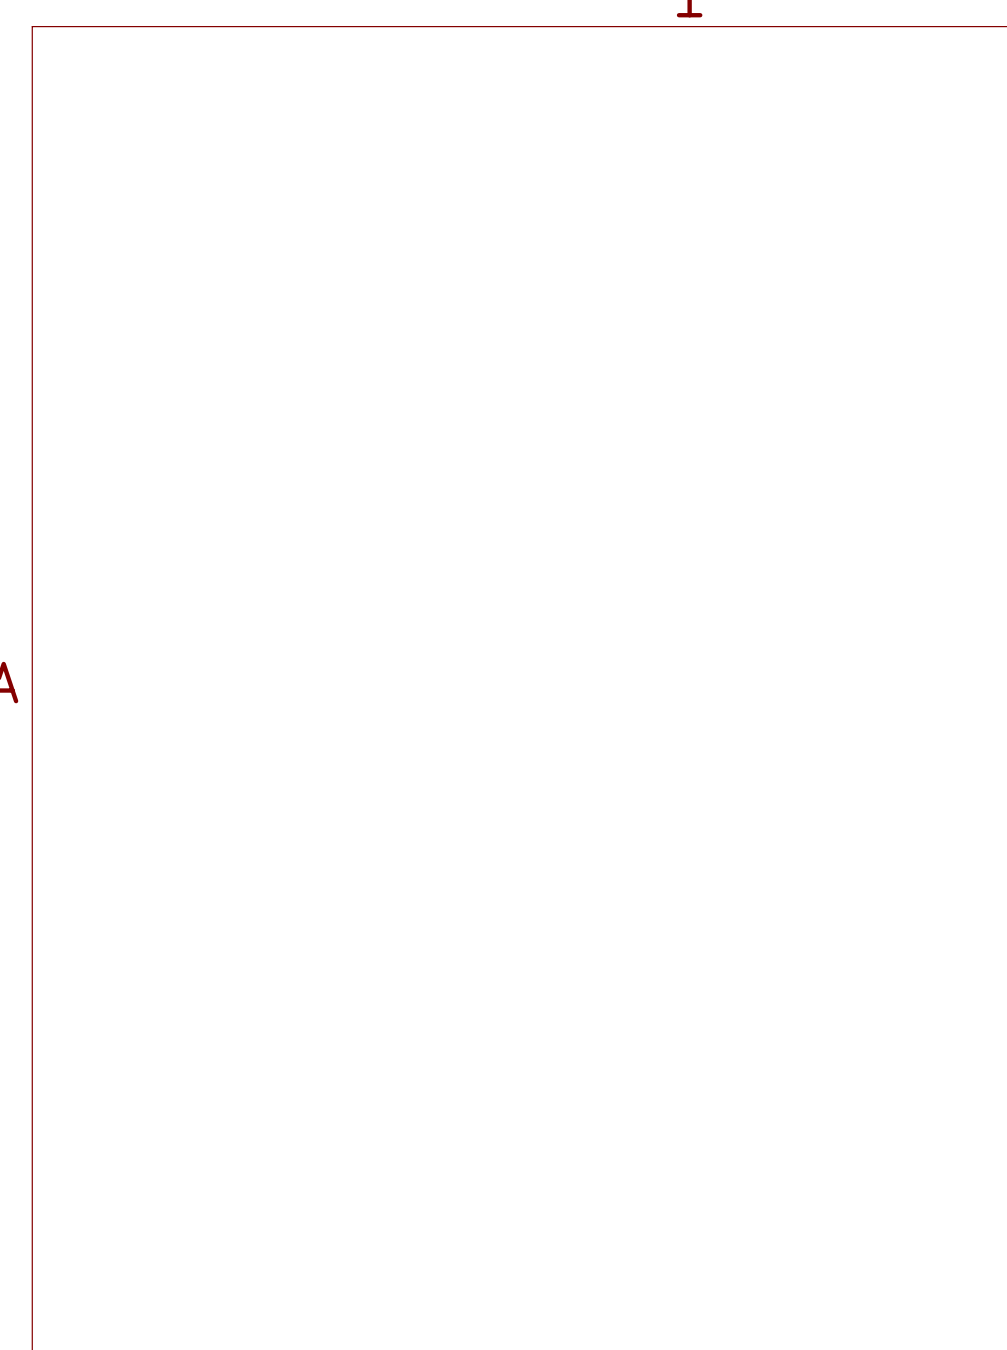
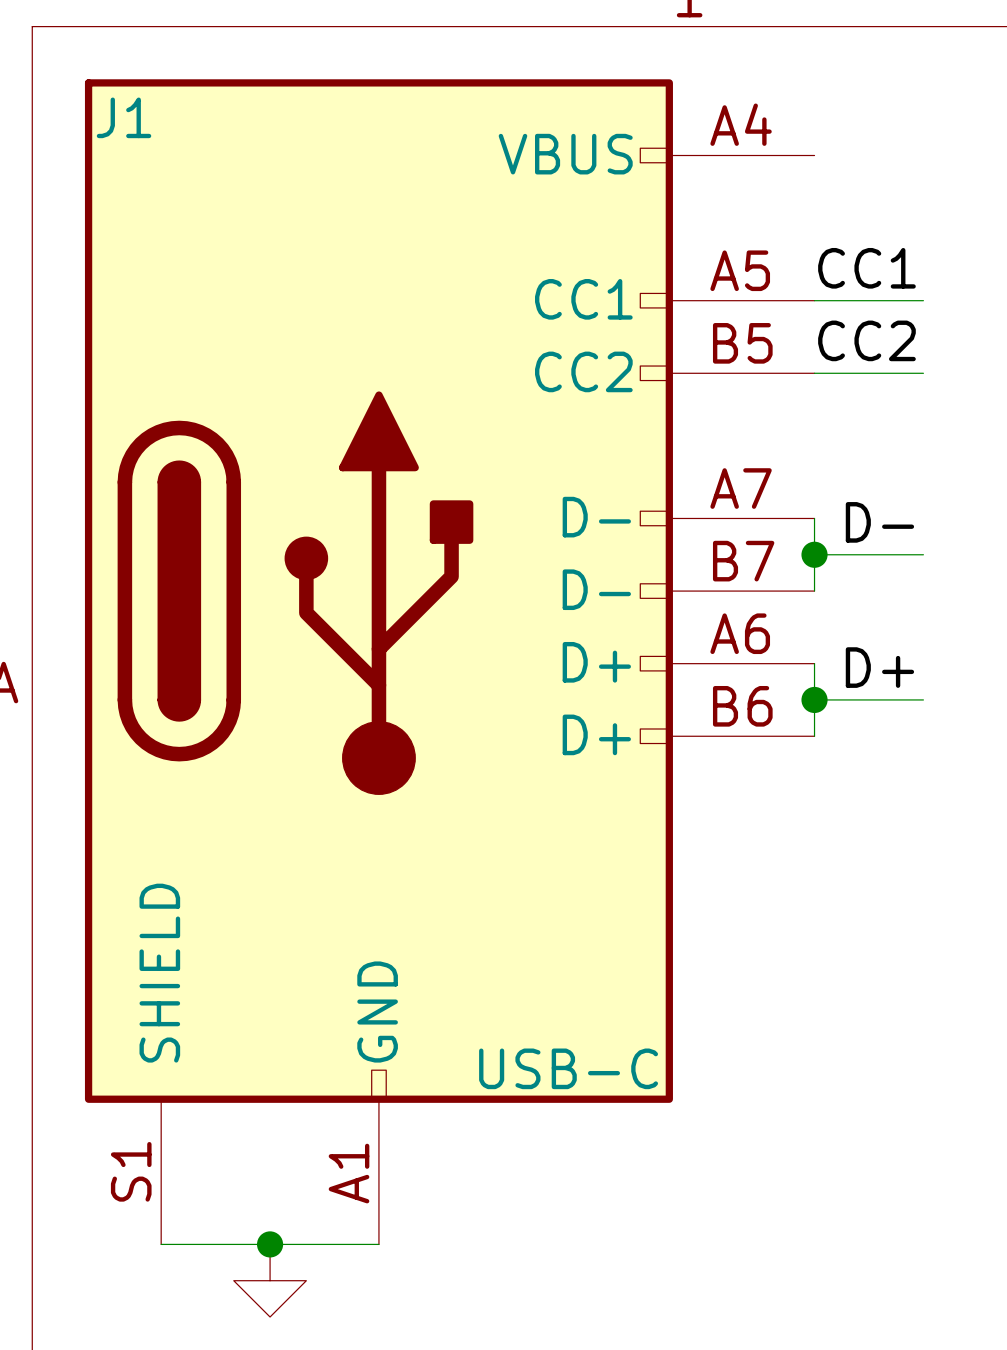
label: none -> CC1 (866, 268)
wire: none -> (814, 300) (923, 300)
label: none -> CC2 (866, 340)
wire: none -> (814, 373) (923, 373)
wire: none -> (814, 518) (814, 591)
label: none -> D- (879, 522)
wire: none -> (814, 554) (923, 554)
junction: none -> (814, 554)
J1: none -> USB-C (449, 661)
wire: none -> (814, 663) (814, 736)
label: none -> D+ (879, 667)
wire: none -> (814, 699) (923, 699)
junction: none -> (814, 699)
wire: none -> (161, 1244) (378, 1244)
junction: none -> (270, 1244)
power symbol: none -> (270, 1280)

